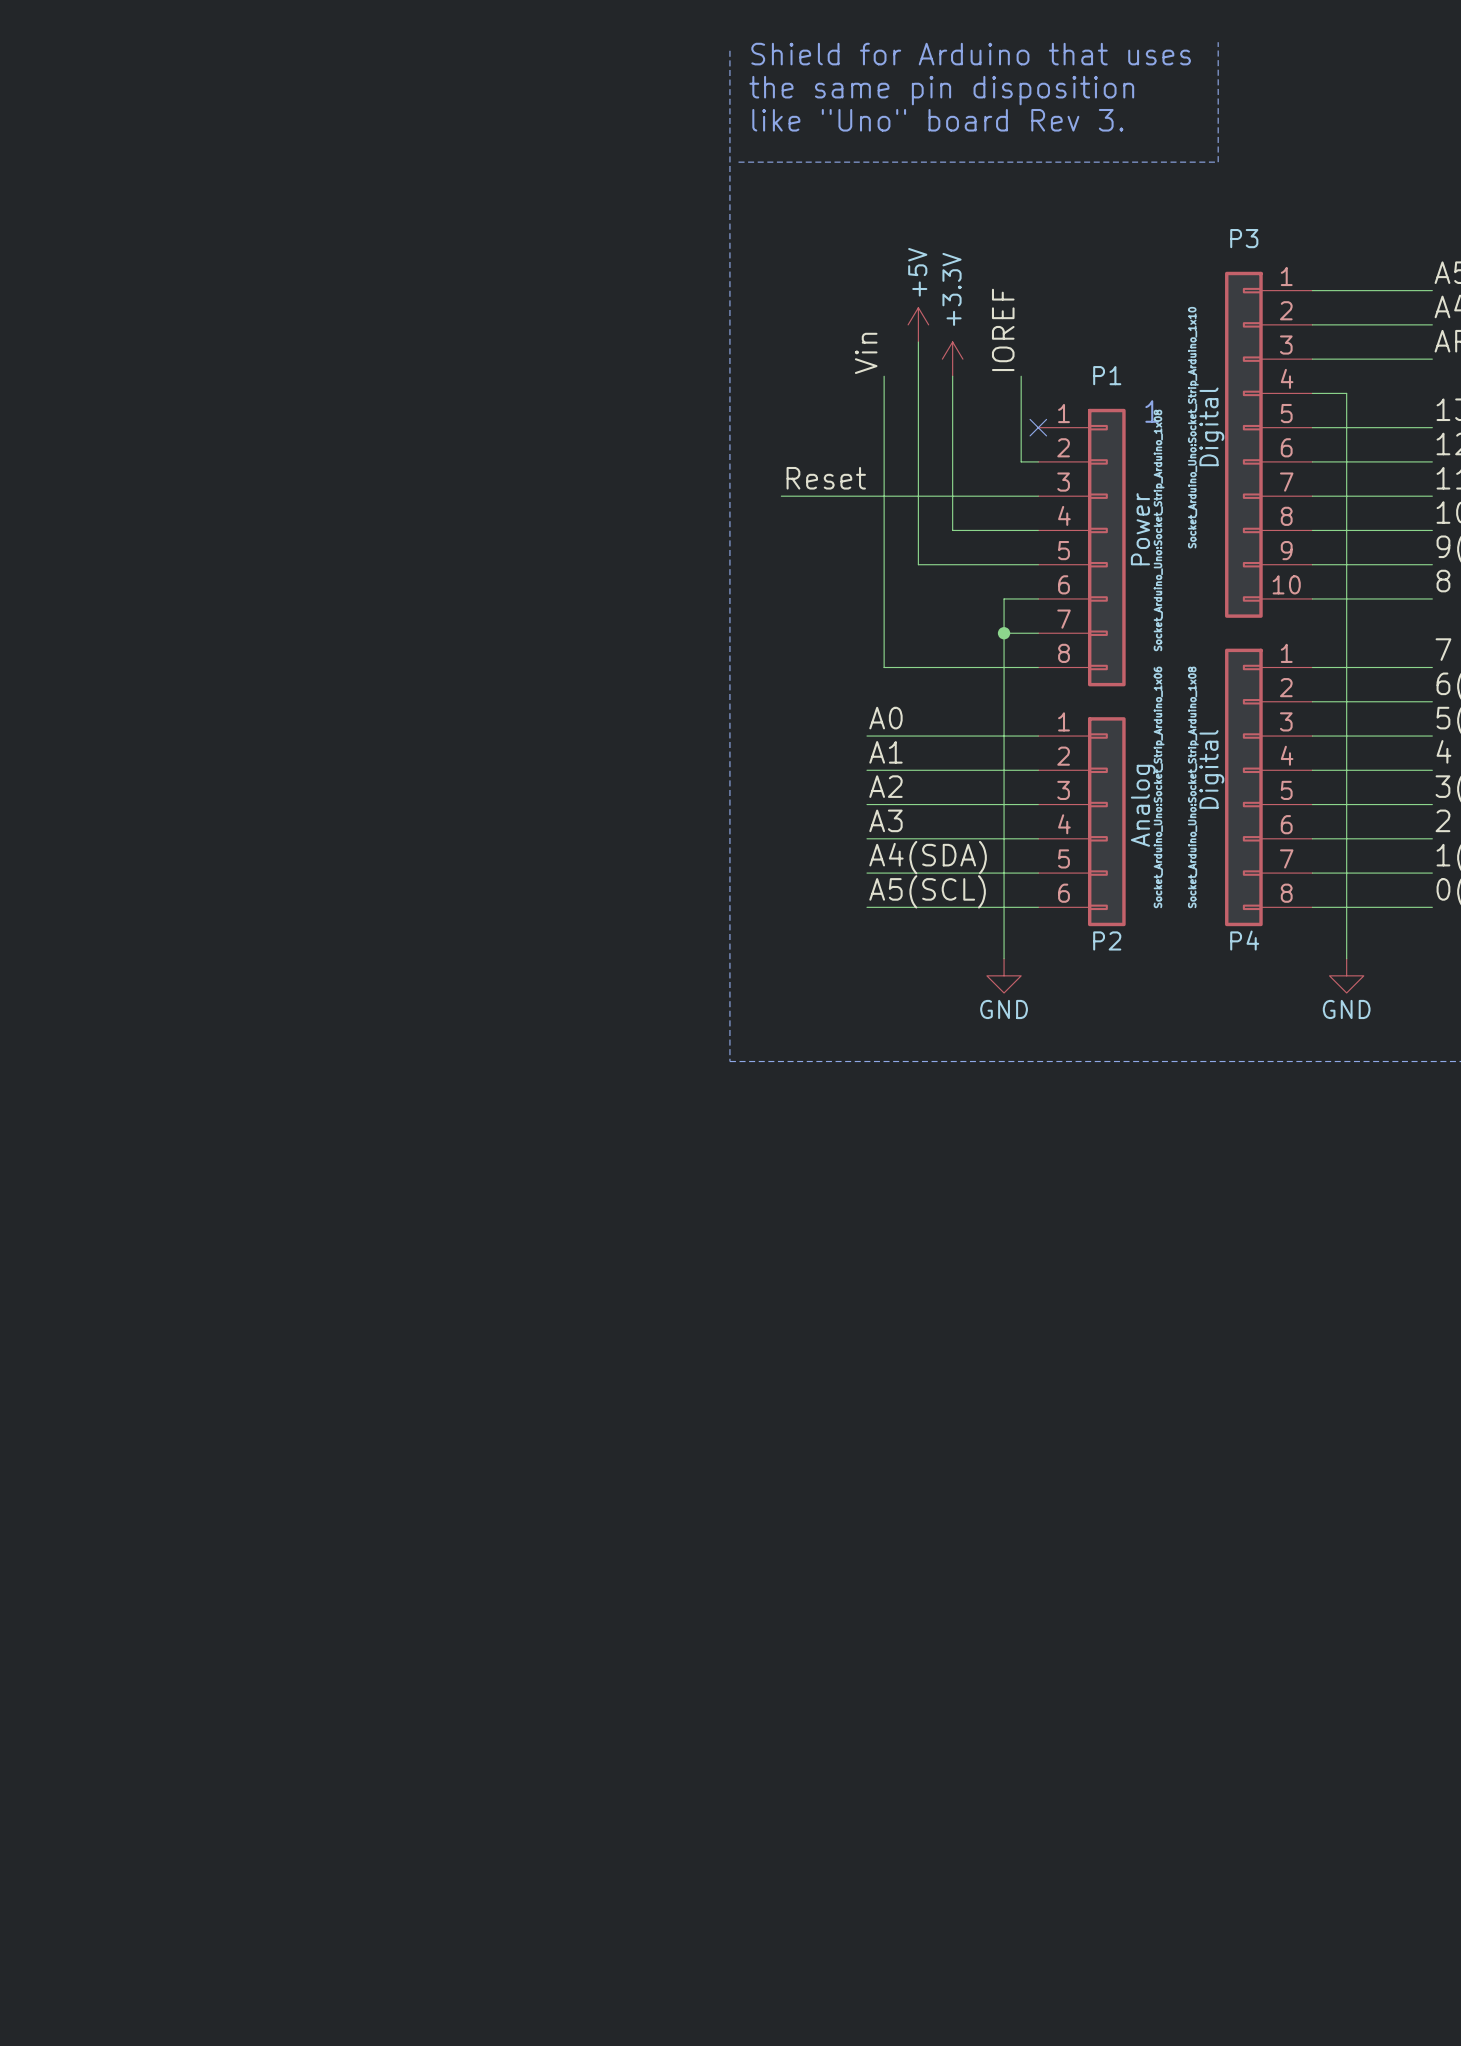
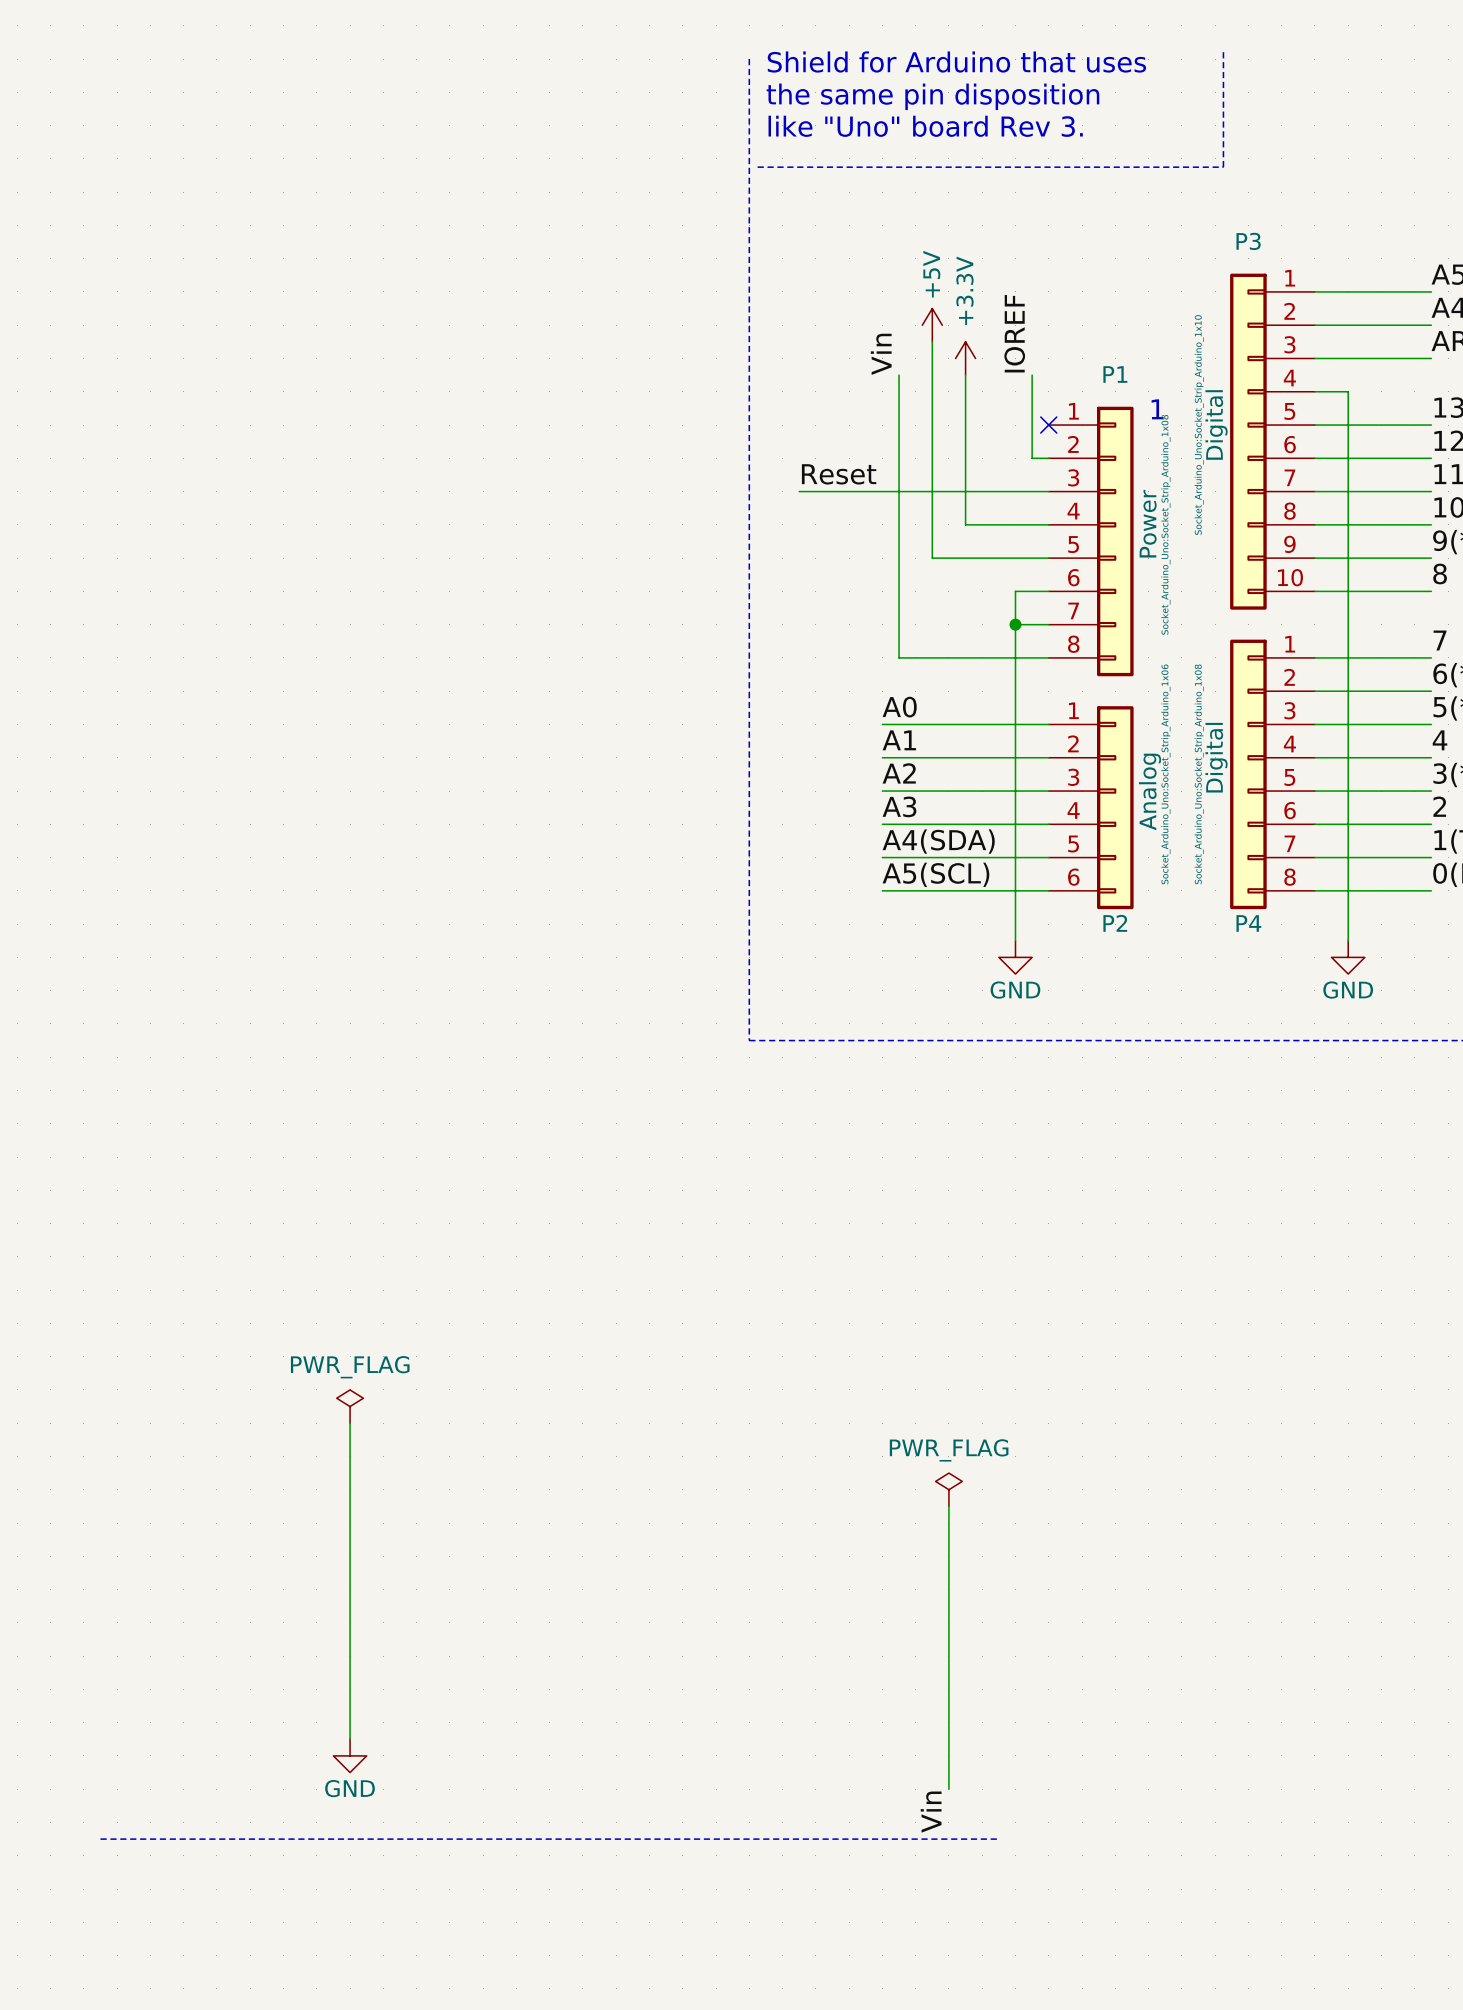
power symbol: none -> PWR_FLAG (350, 1406)
wire: none -> (350, 1423) (350, 1739)
power symbol: none -> PWR_FLAG (948, 1489)
wire: none -> (948, 1506) (948, 1789)
power symbol: none -> GND (350, 1755)
label: none -> Vin (931, 1812)
line: none -> (100, 1839) (998, 1839)

